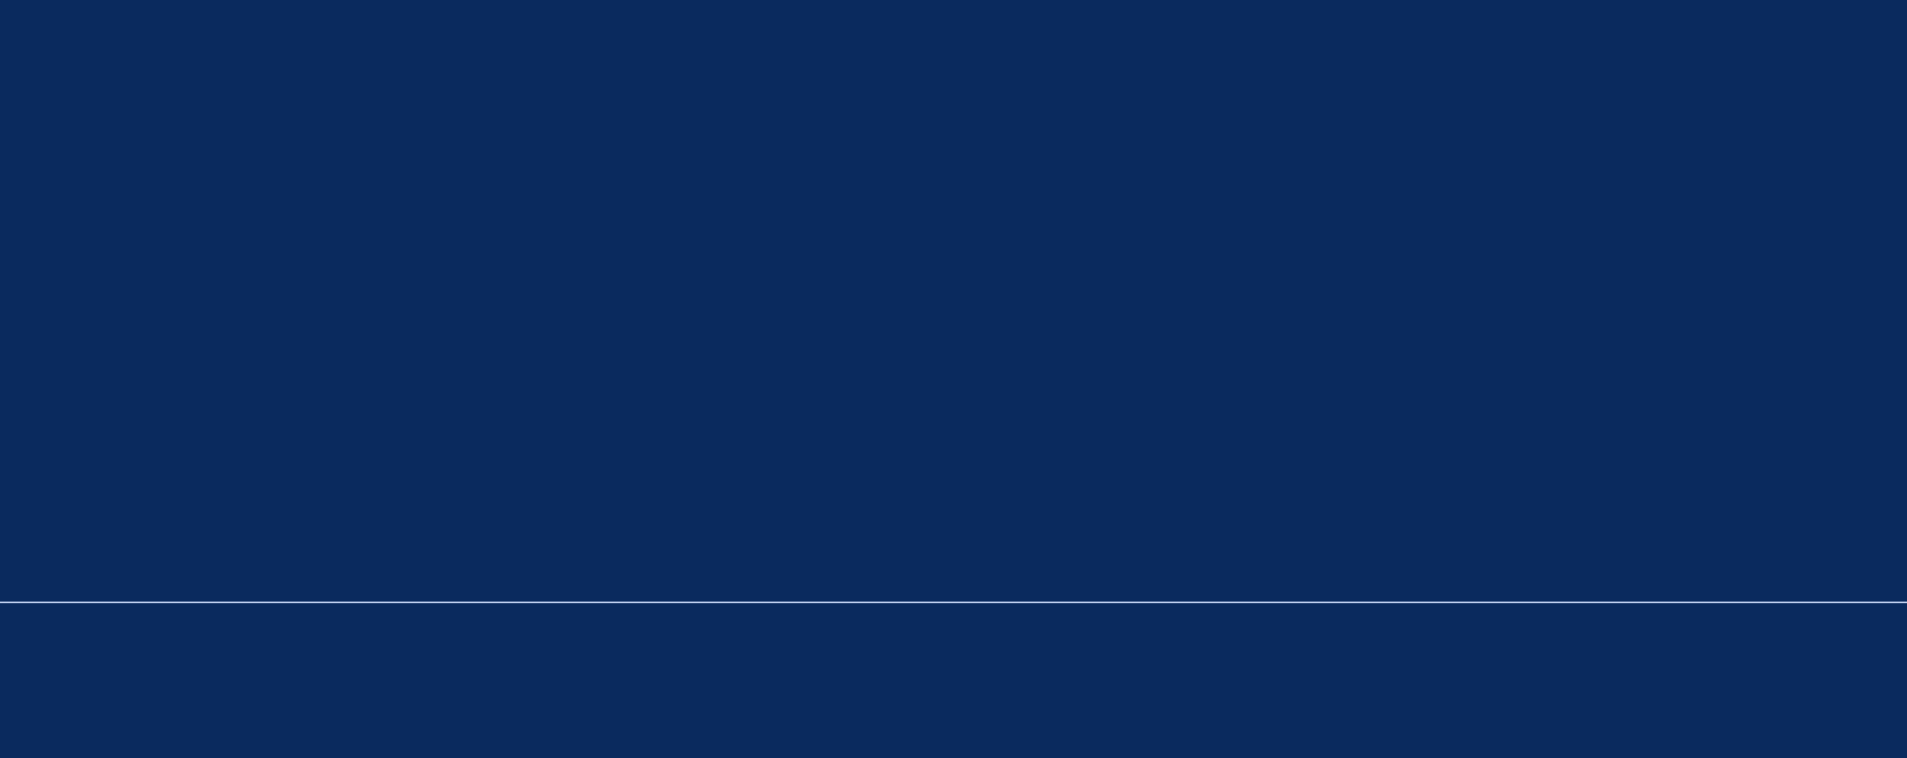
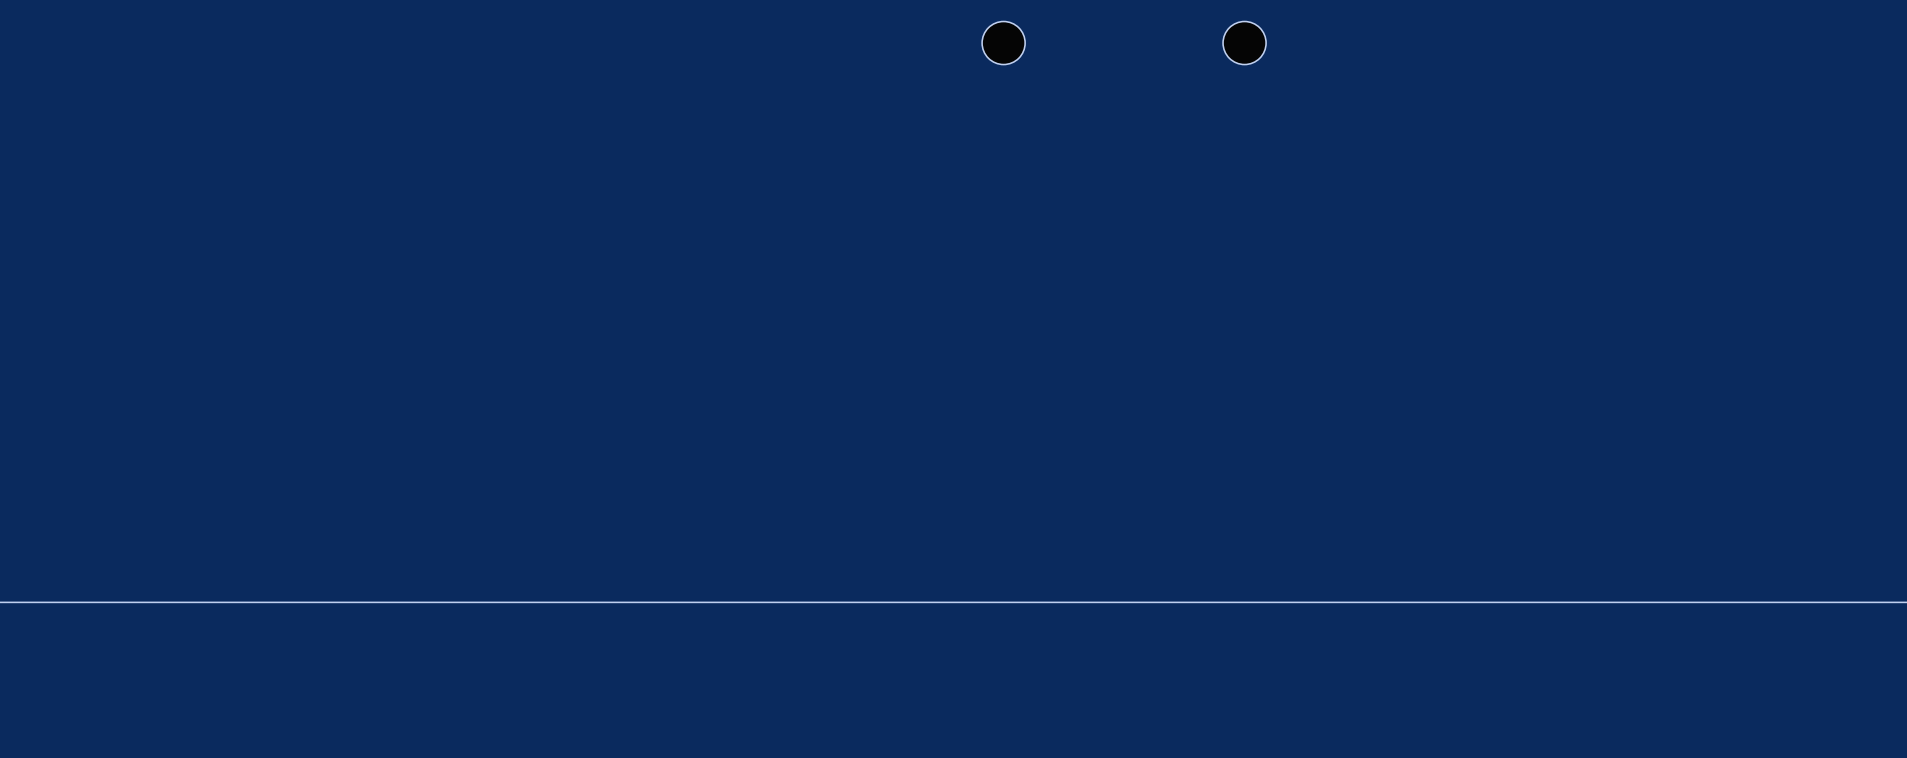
hole: none -> (1003, 43)
hole: none -> (1244, 43)

